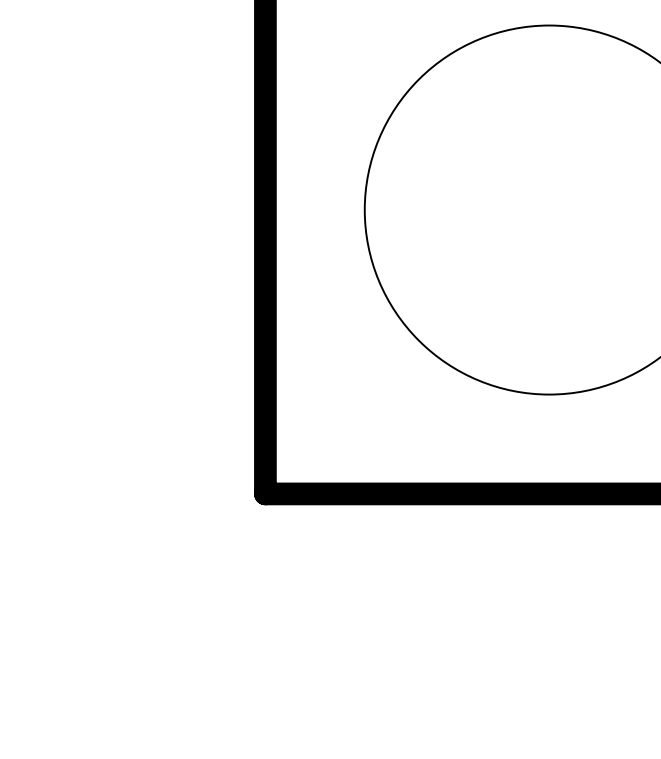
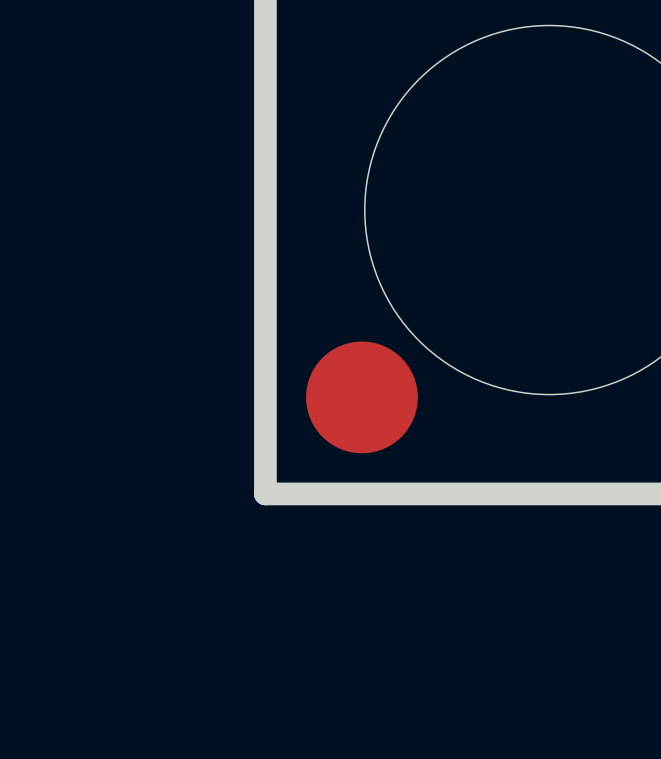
part: none -> (361, 397)

